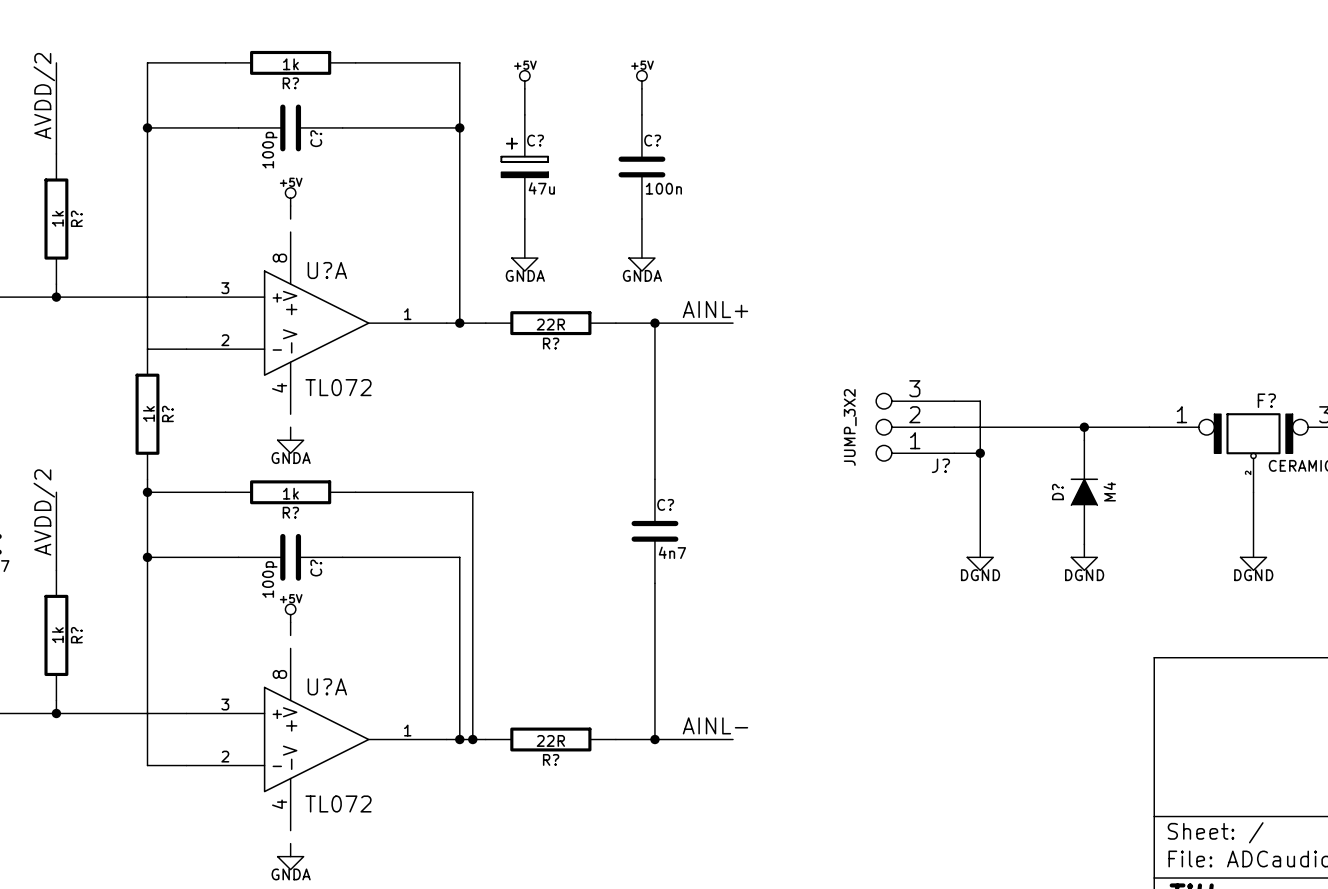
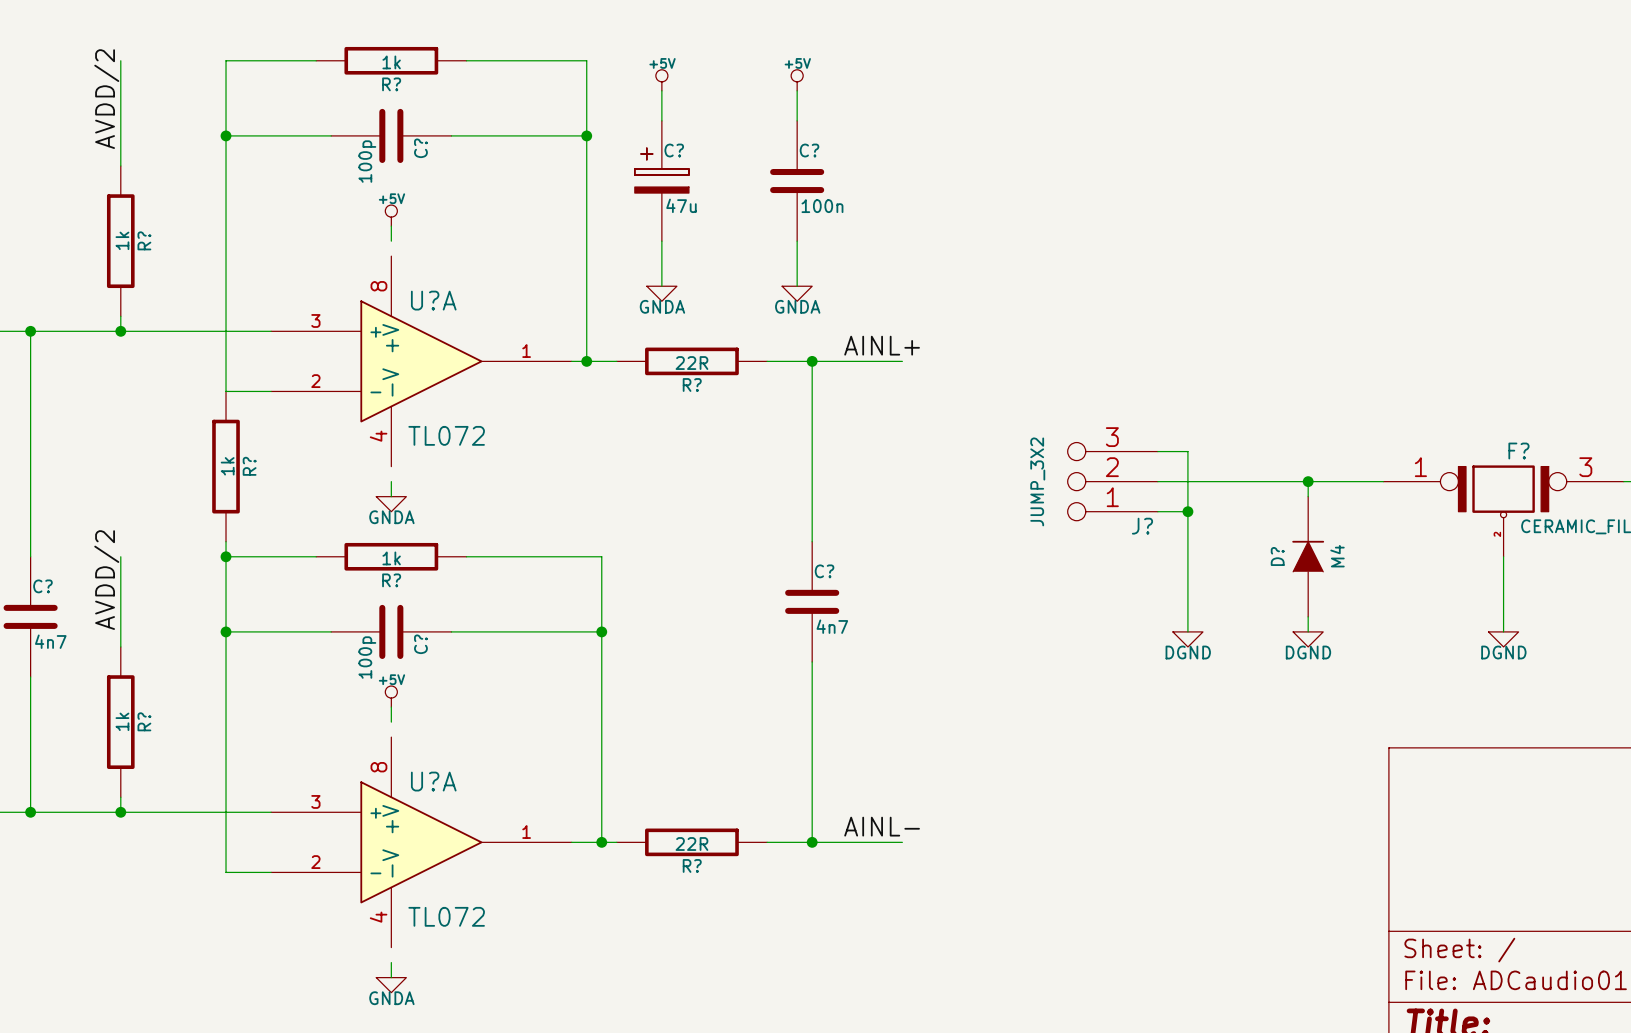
wire: (459, 557) (459, 739) -> (586, 631) (601, 631)
junction: none -> (601, 631)
junction: (459, 739) -> none

